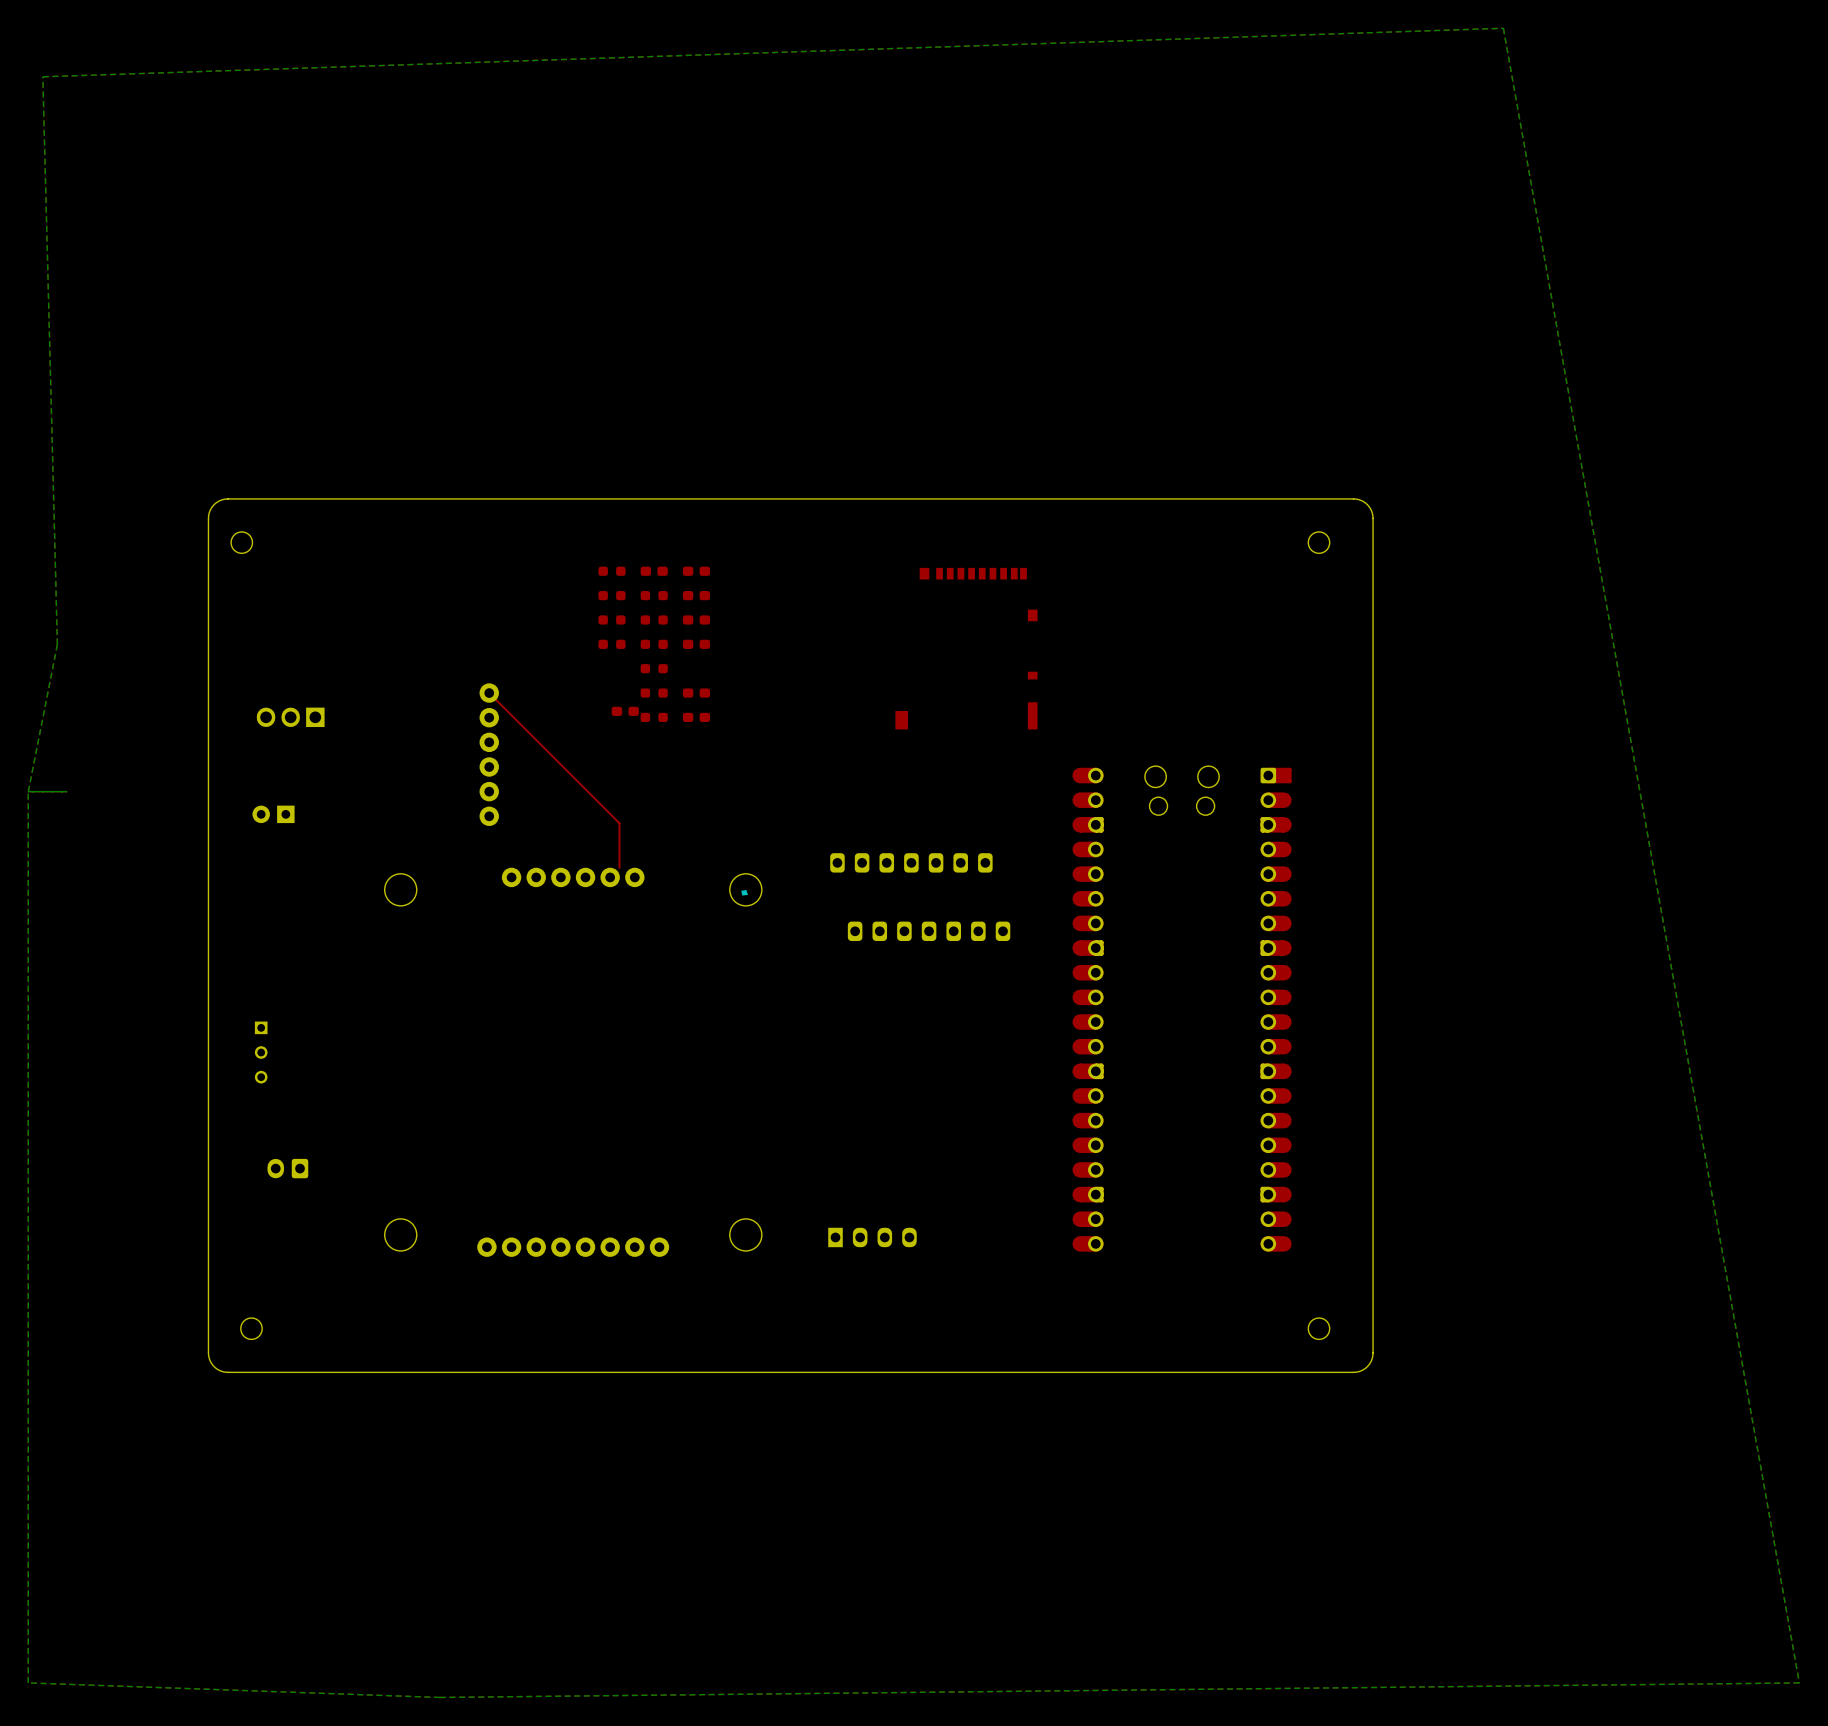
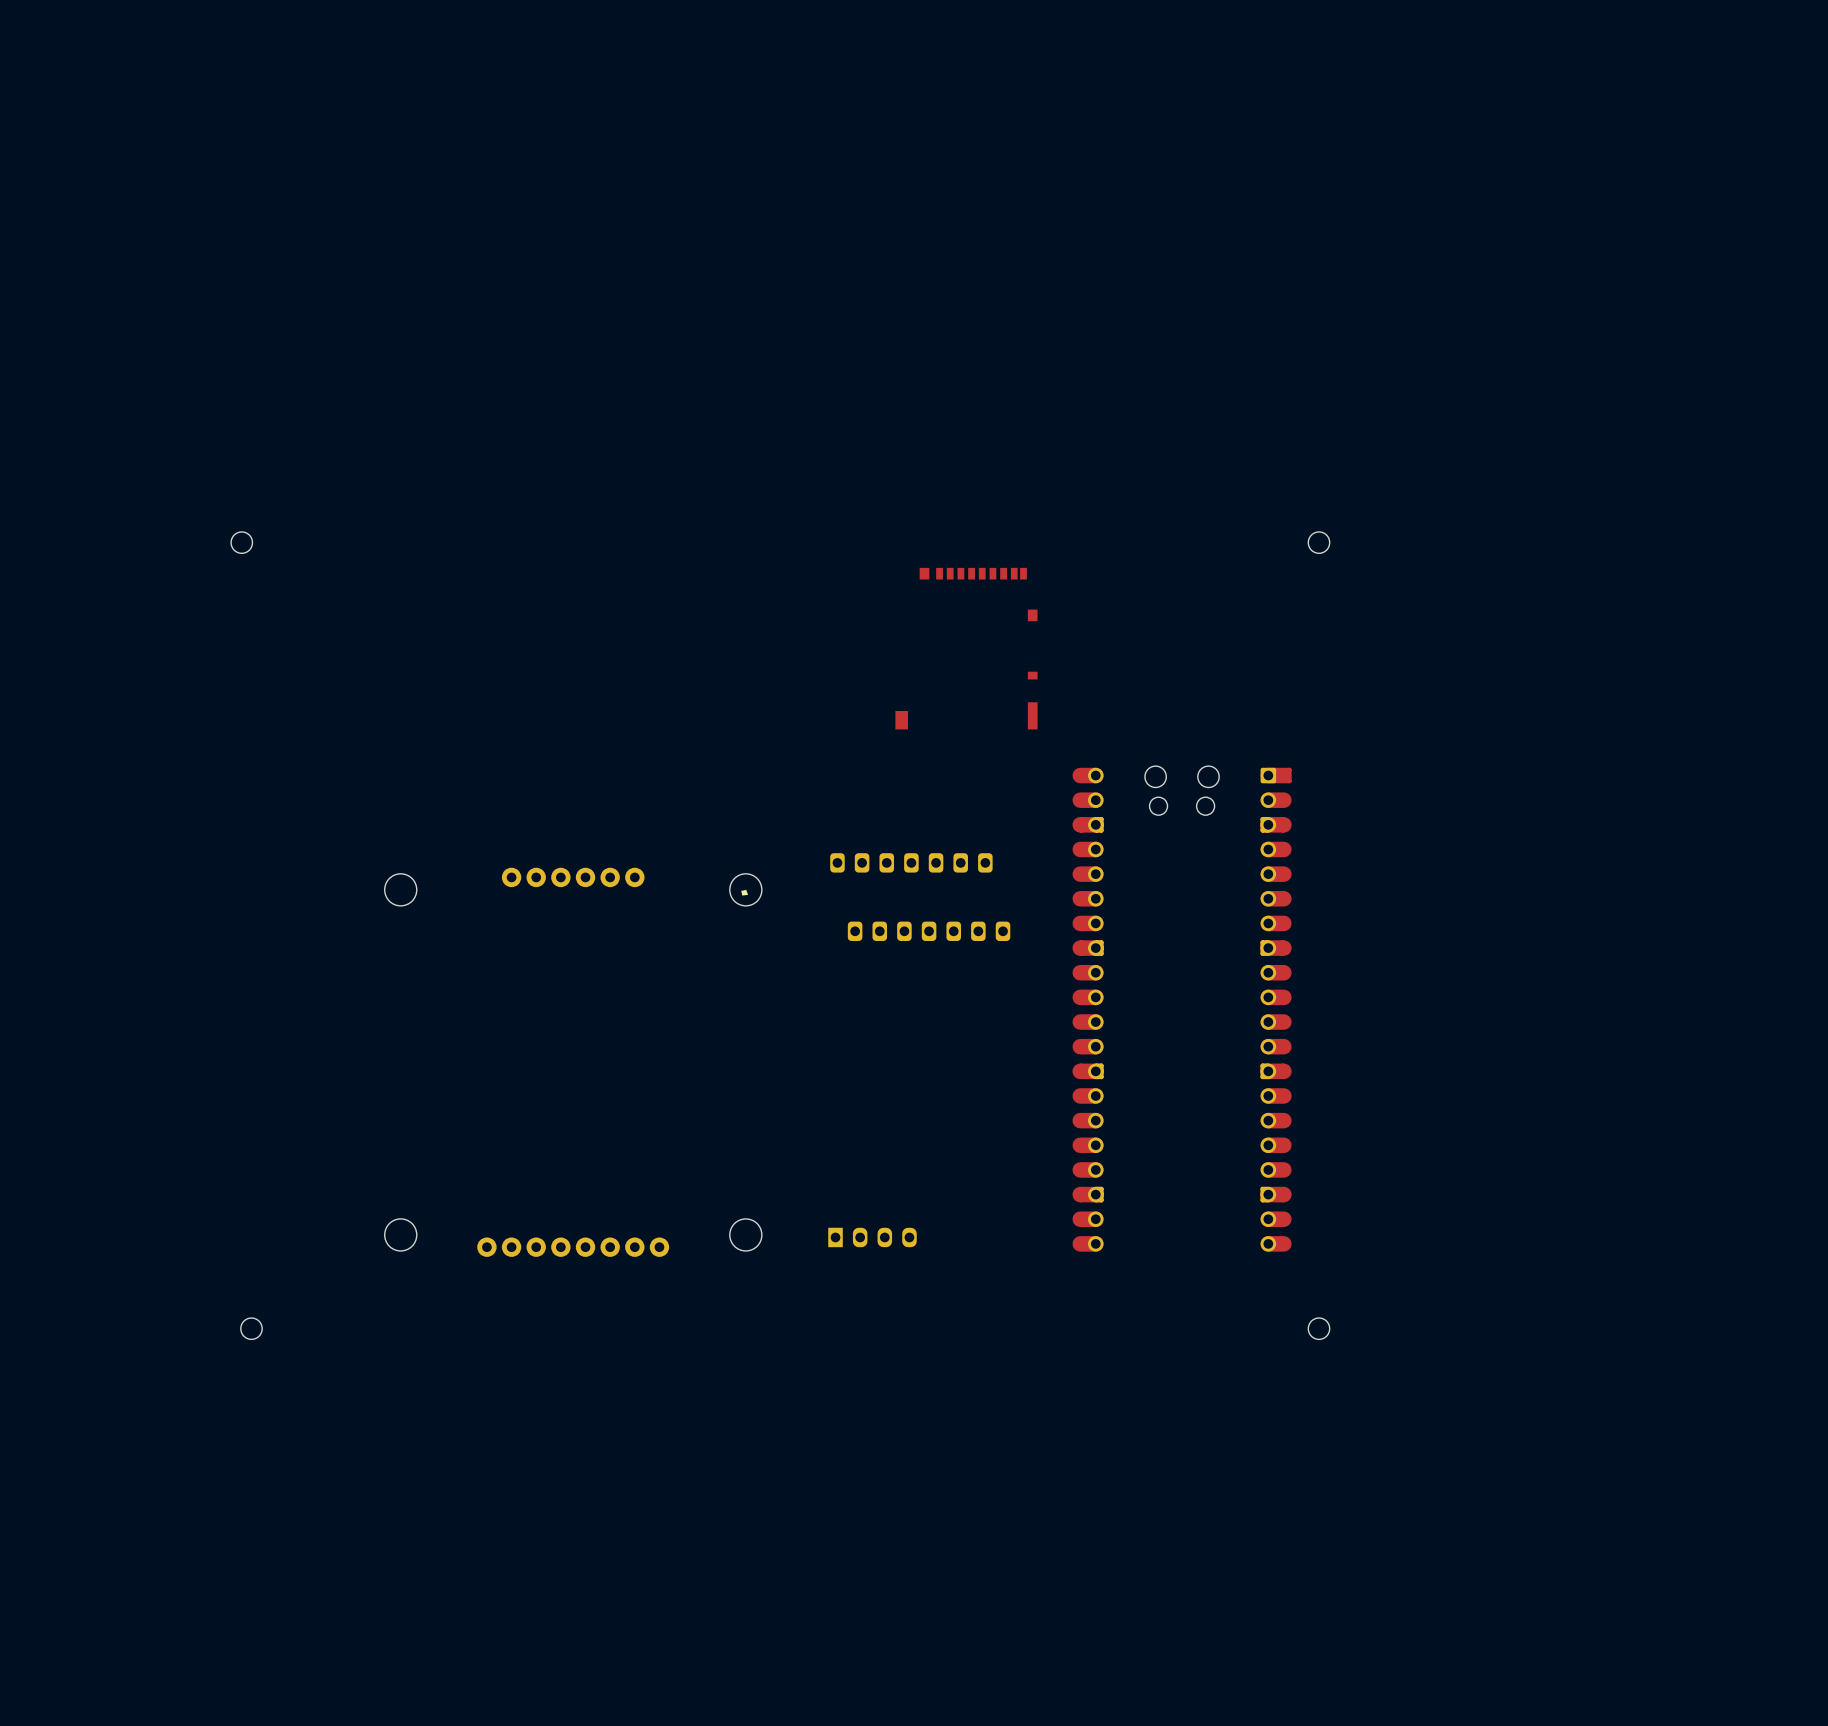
board edge: (1353, 498) (227, 498) (215, 503) (210, 509) (208, 518) (208, 1352) (212, 1365) (219, 1370) (227, 1372) (1353, 1372) (1365, 1368) (1371, 1361) (1373, 1352) (1373, 518) (1367, 504) (1353, 498) -> none
part: (612, 571) -> none
part: (654, 571) -> none
part: (696, 571) -> none
part: (612, 595) -> none
part: (654, 595) -> none
part: (696, 595) -> none
part: (612, 619) -> none
part: (654, 619) -> none
part: (696, 619) -> none
part: (612, 644) -> none
part: (654, 644) -> none
part: (696, 644) -> none
part: (654, 668) -> none
top track: (489, 693) (619, 823) (619, 867) -> none
part: (654, 693) -> none
part: (696, 693) -> none
part: (625, 711) -> none
part: (290, 717) -> none
part: (654, 717) -> none
part: (696, 717) -> none
part: (489, 754) -> none
bottom zone outline: (28, 791) (28, 1682) (439, 1697) (1799, 1682) (1503, 28) (42, 76) (57, 644) (28, 791) -> none
bottom zone outline: (67, 791) (28, 791) -> none
part: (273, 814) -> none
part: (261, 1052) -> none
part: (287, 1168) -> none

